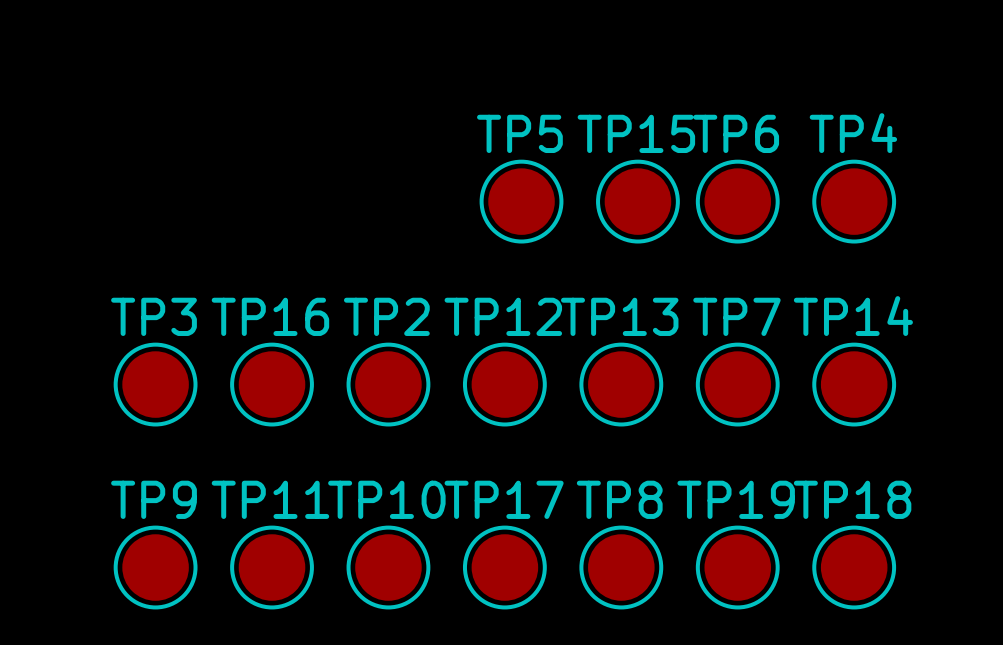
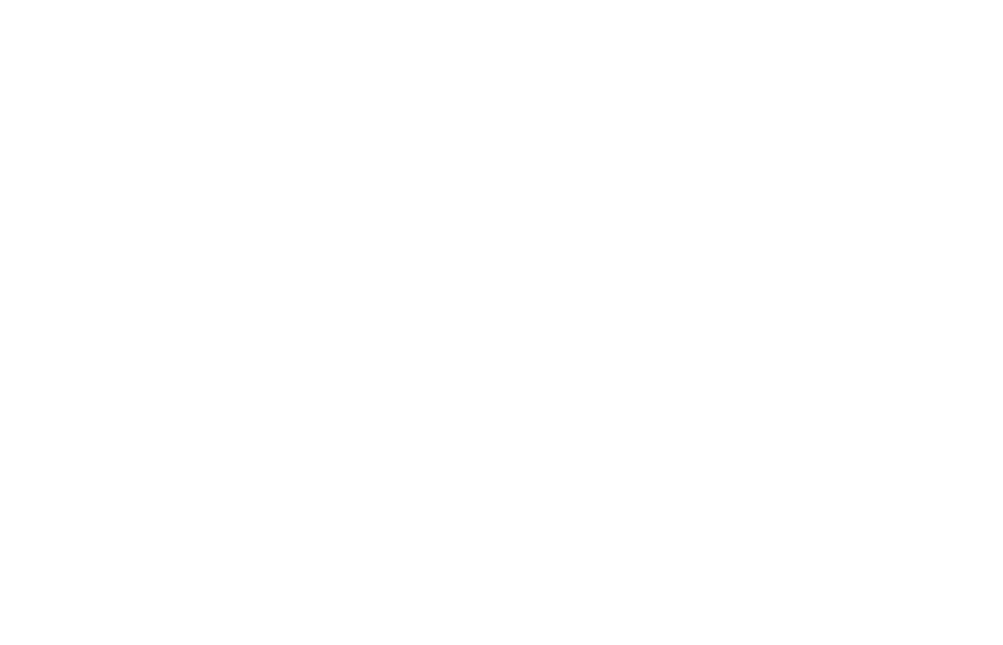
TP5: (521, 201) -> none
TP15: (637, 201) -> none
TP6: (737, 201) -> none
TP4: (854, 201) -> none
TP3: (155, 384) -> none
TP16: (272, 384) -> none
TP2: (388, 384) -> none
TP12: (504, 384) -> none
TP13: (621, 384) -> none
TP7: (737, 384) -> none
TP14: (854, 384) -> none
TP9: (155, 567) -> none
TP11: (272, 567) -> none
TP10: (388, 567) -> none
TP17: (504, 567) -> none
TP8: (621, 567) -> none
TP19: (737, 567) -> none
TP18: (854, 567) -> none

